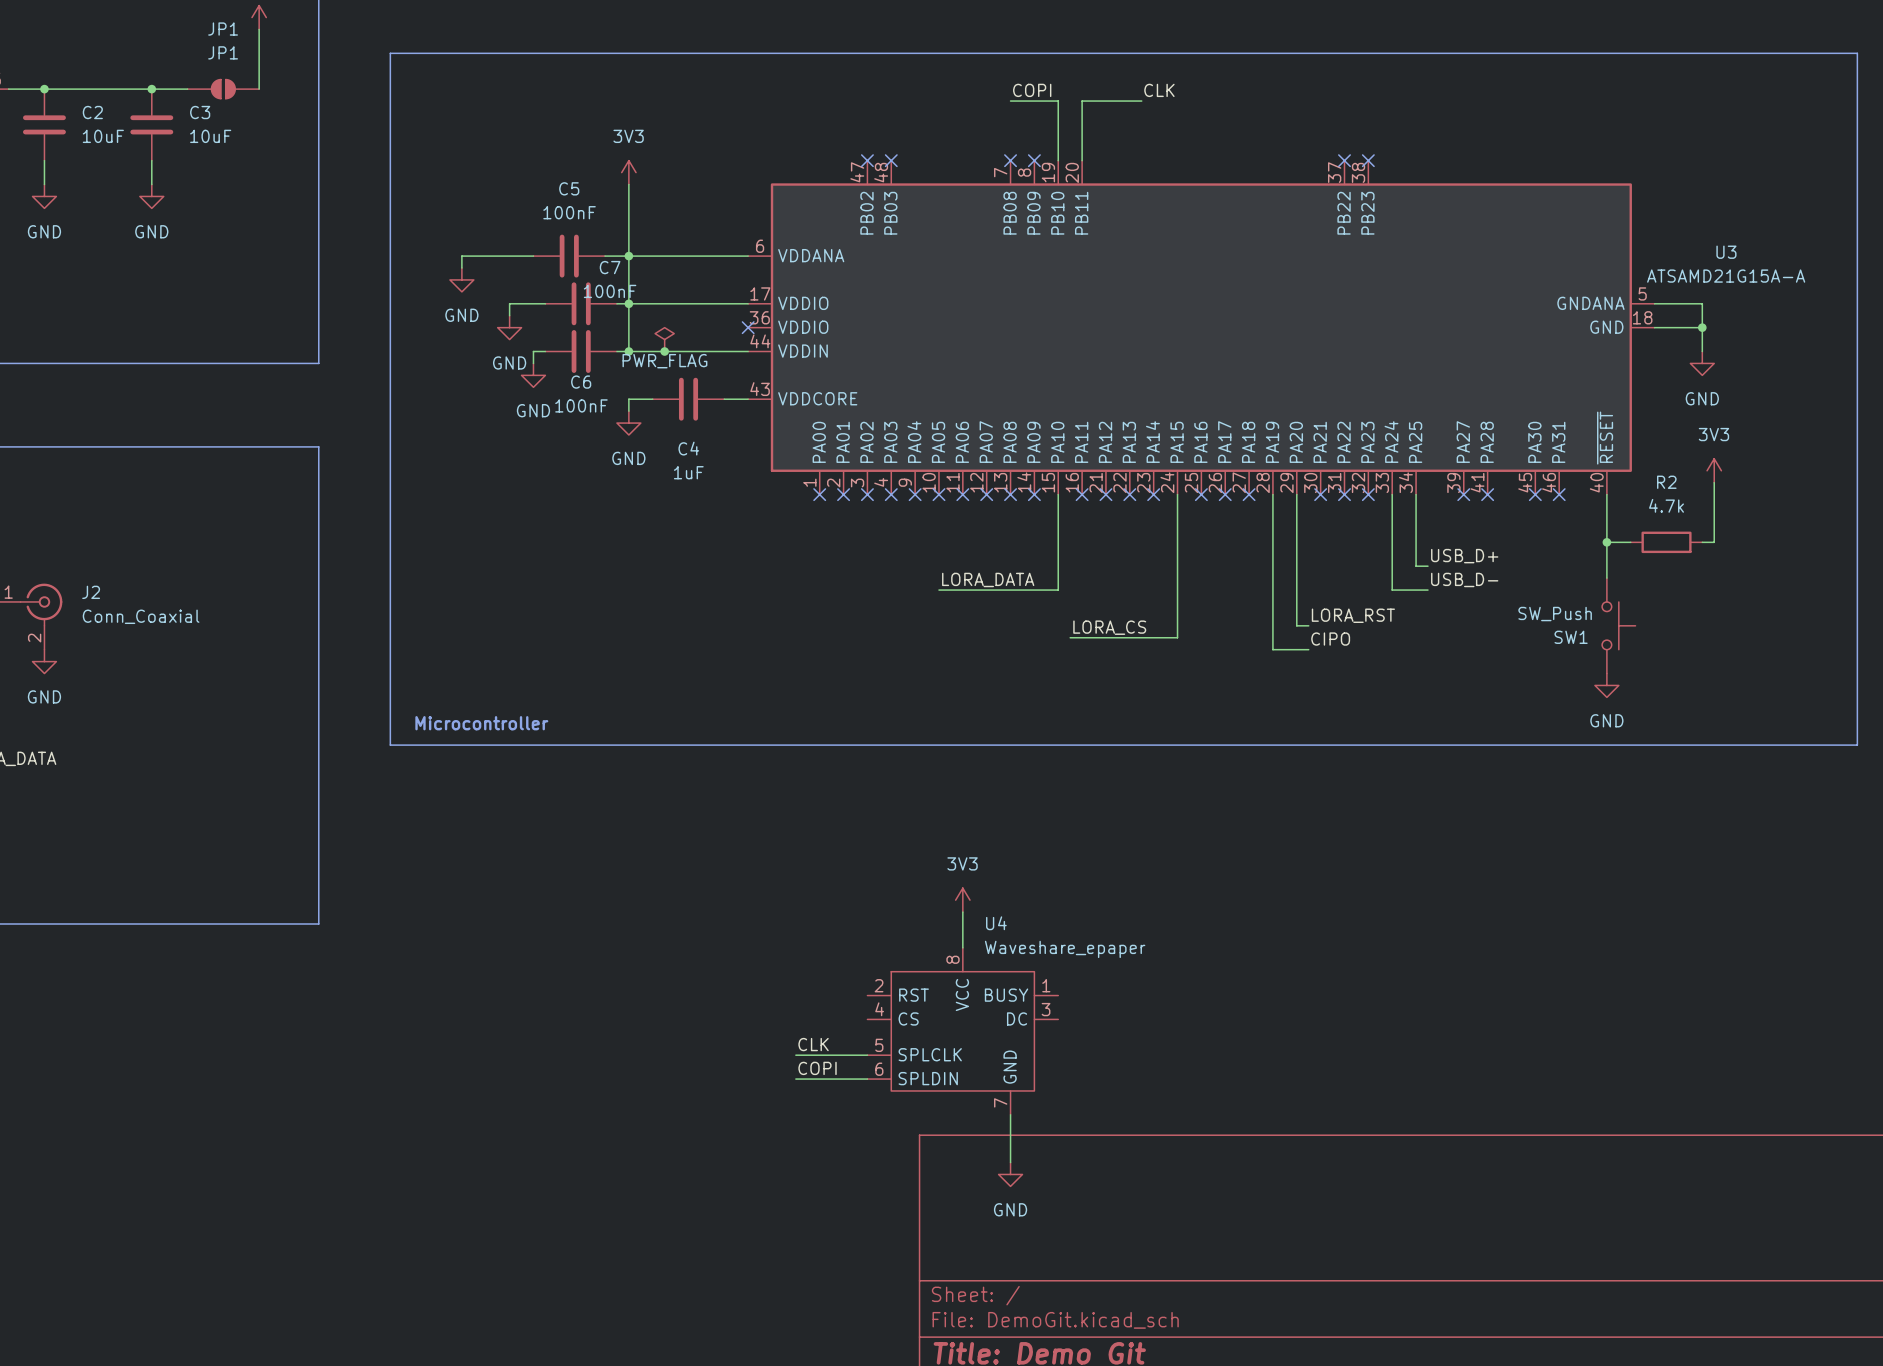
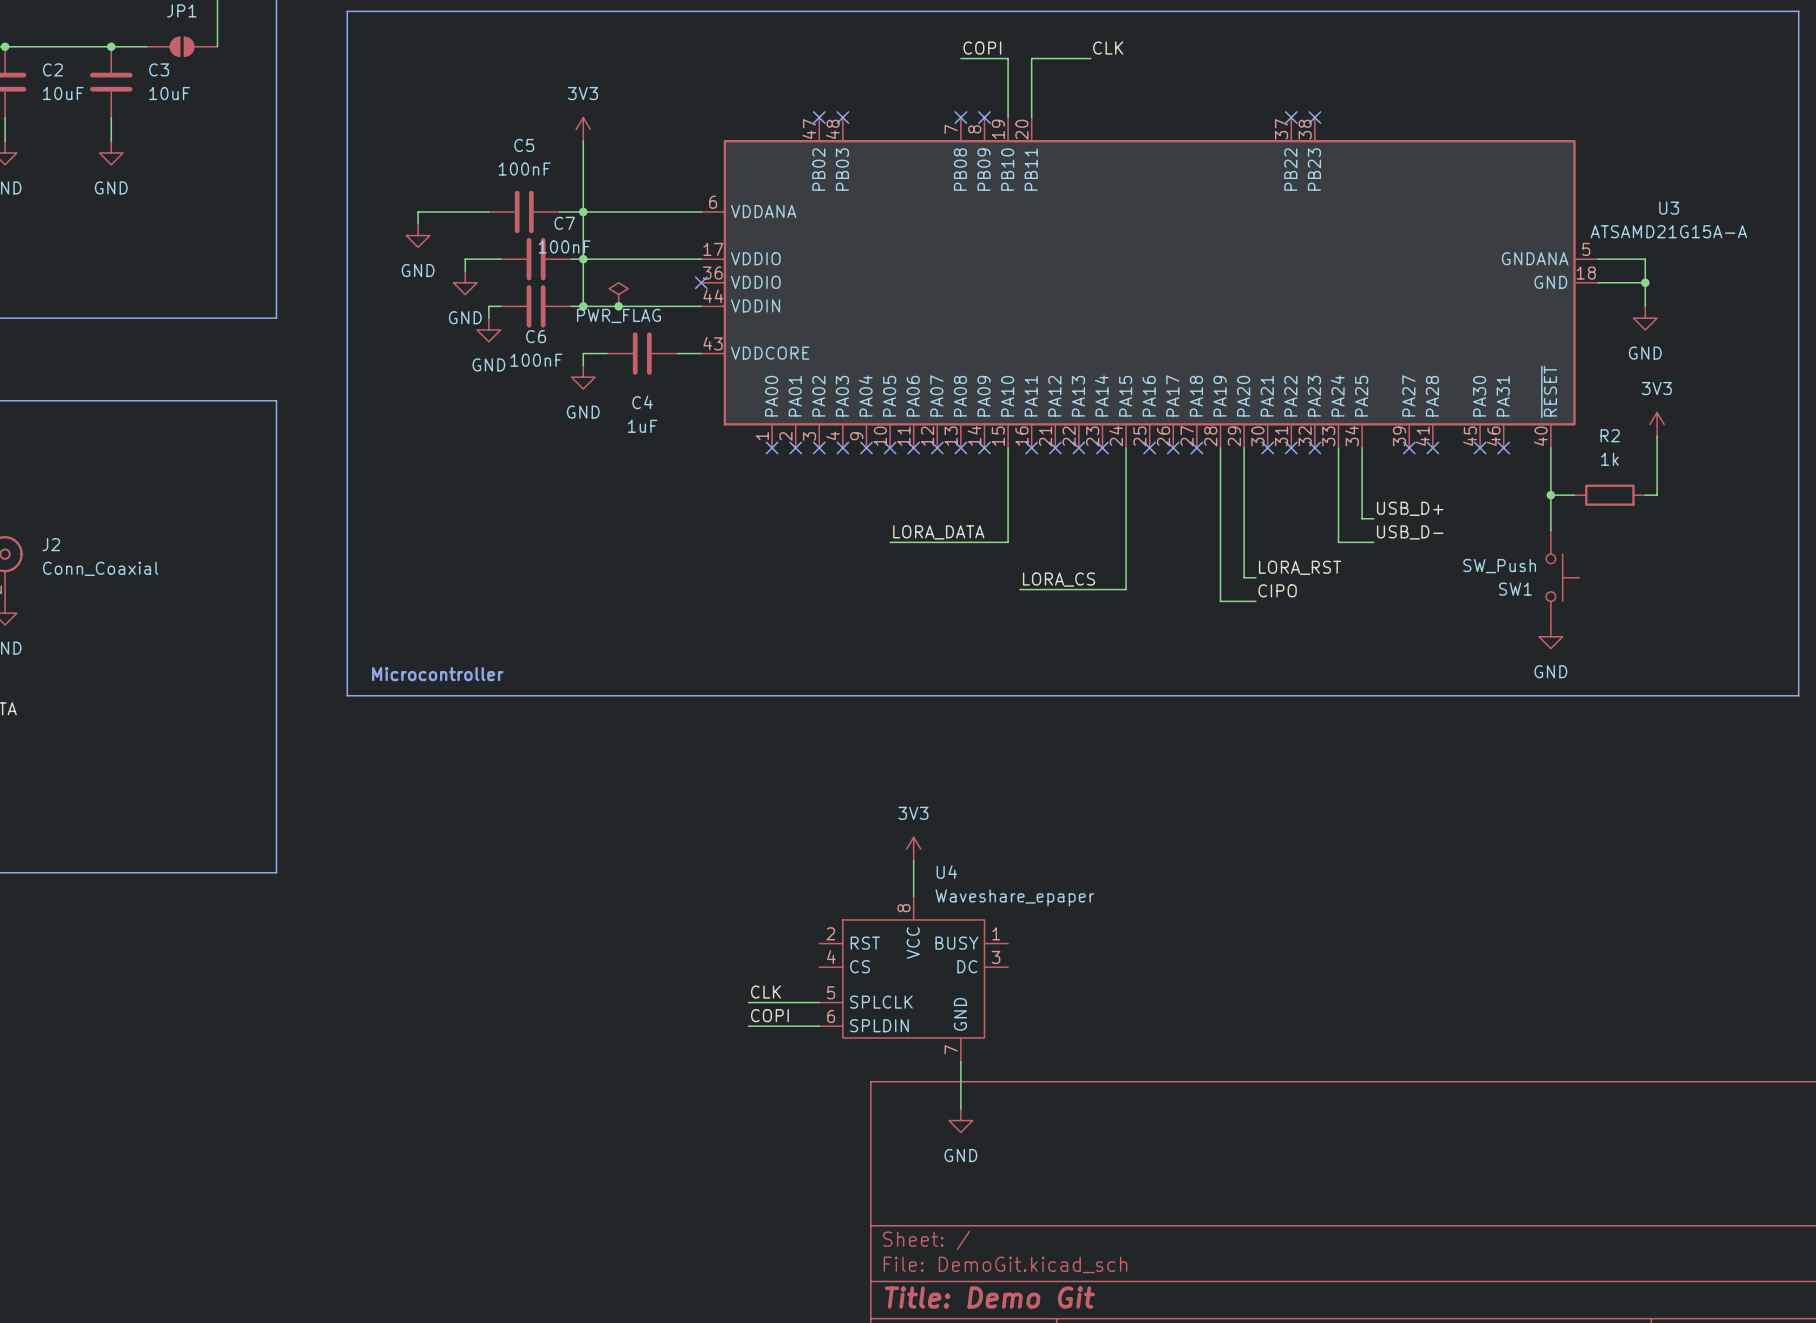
R2 value: 4.7k (1666, 505) -> 1k (1609, 459)

